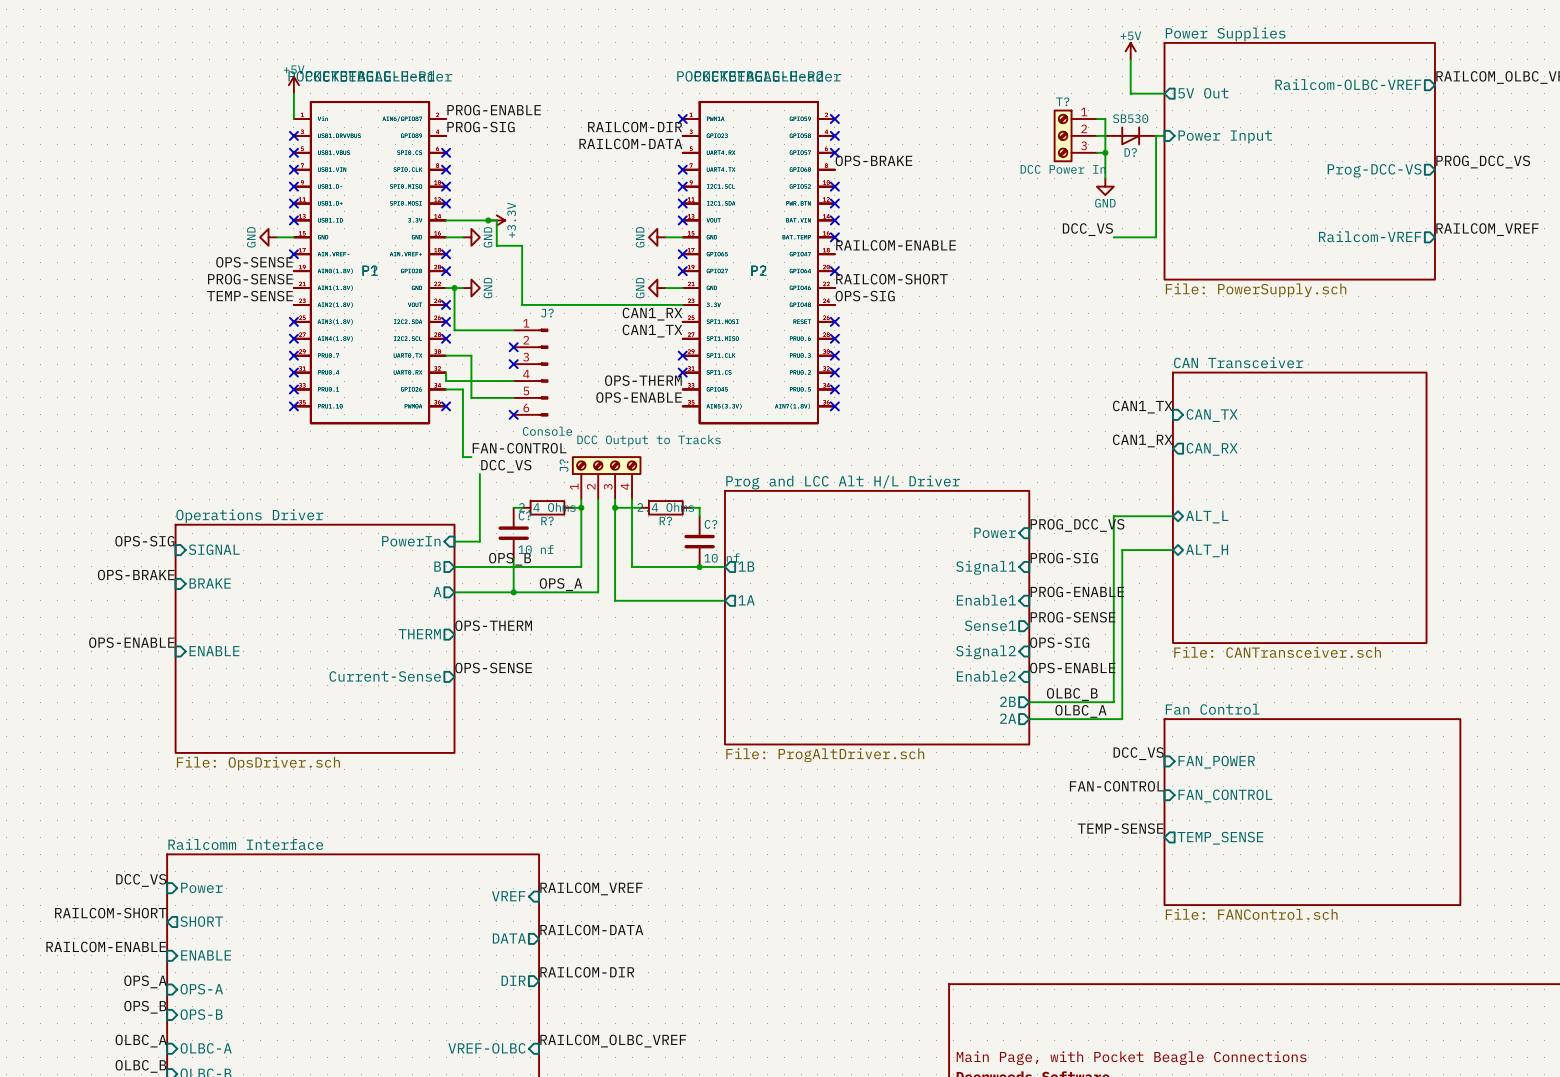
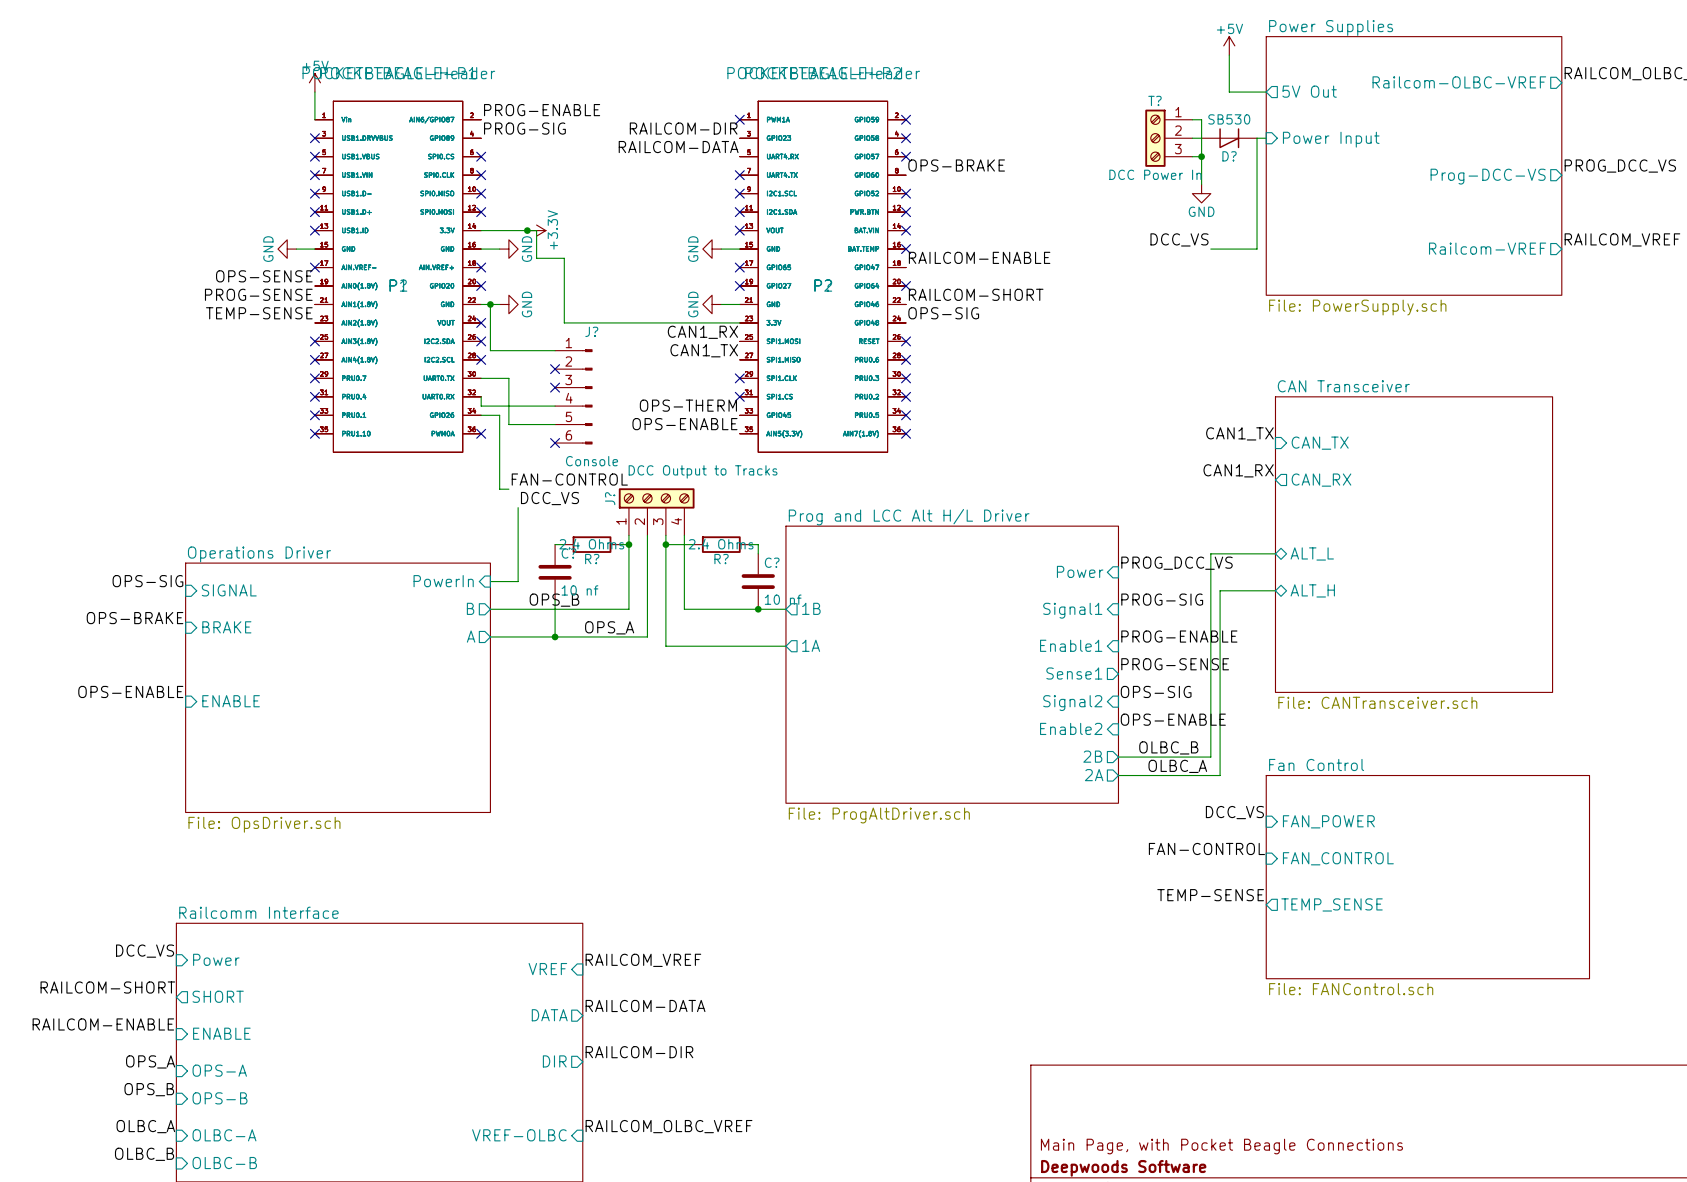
label: OPS-THERM (493, 625) -> none
sheet pin: THERM (419, 634) -> none
label: OPS-SENSE (493, 668) -> none
sheet pin: Current-Sense (385, 676) -> none

